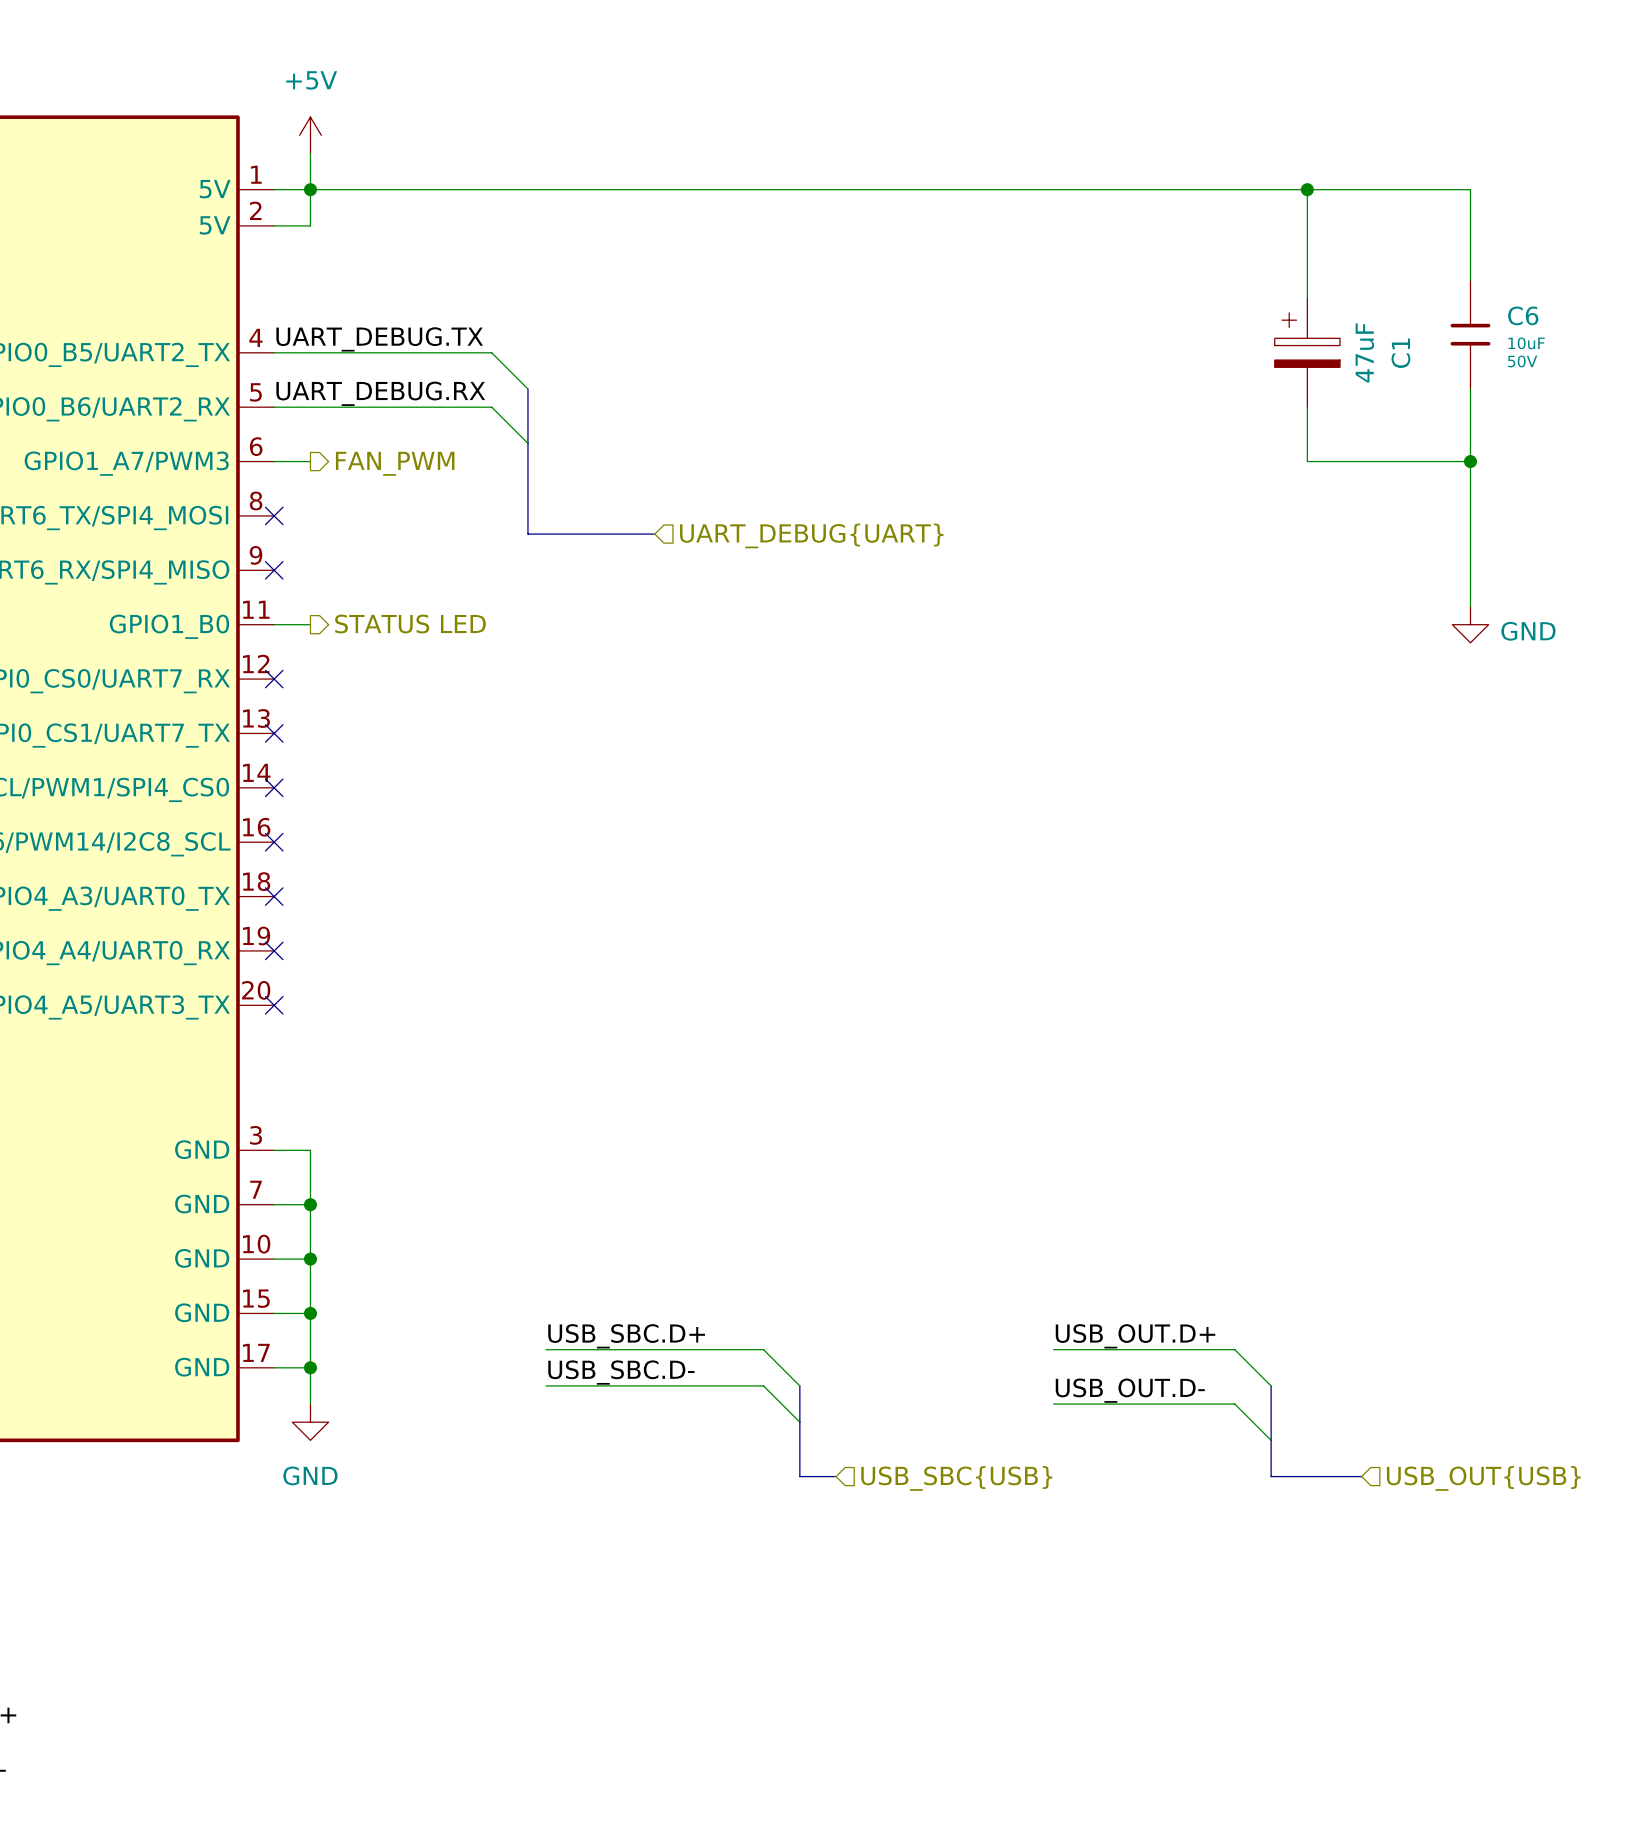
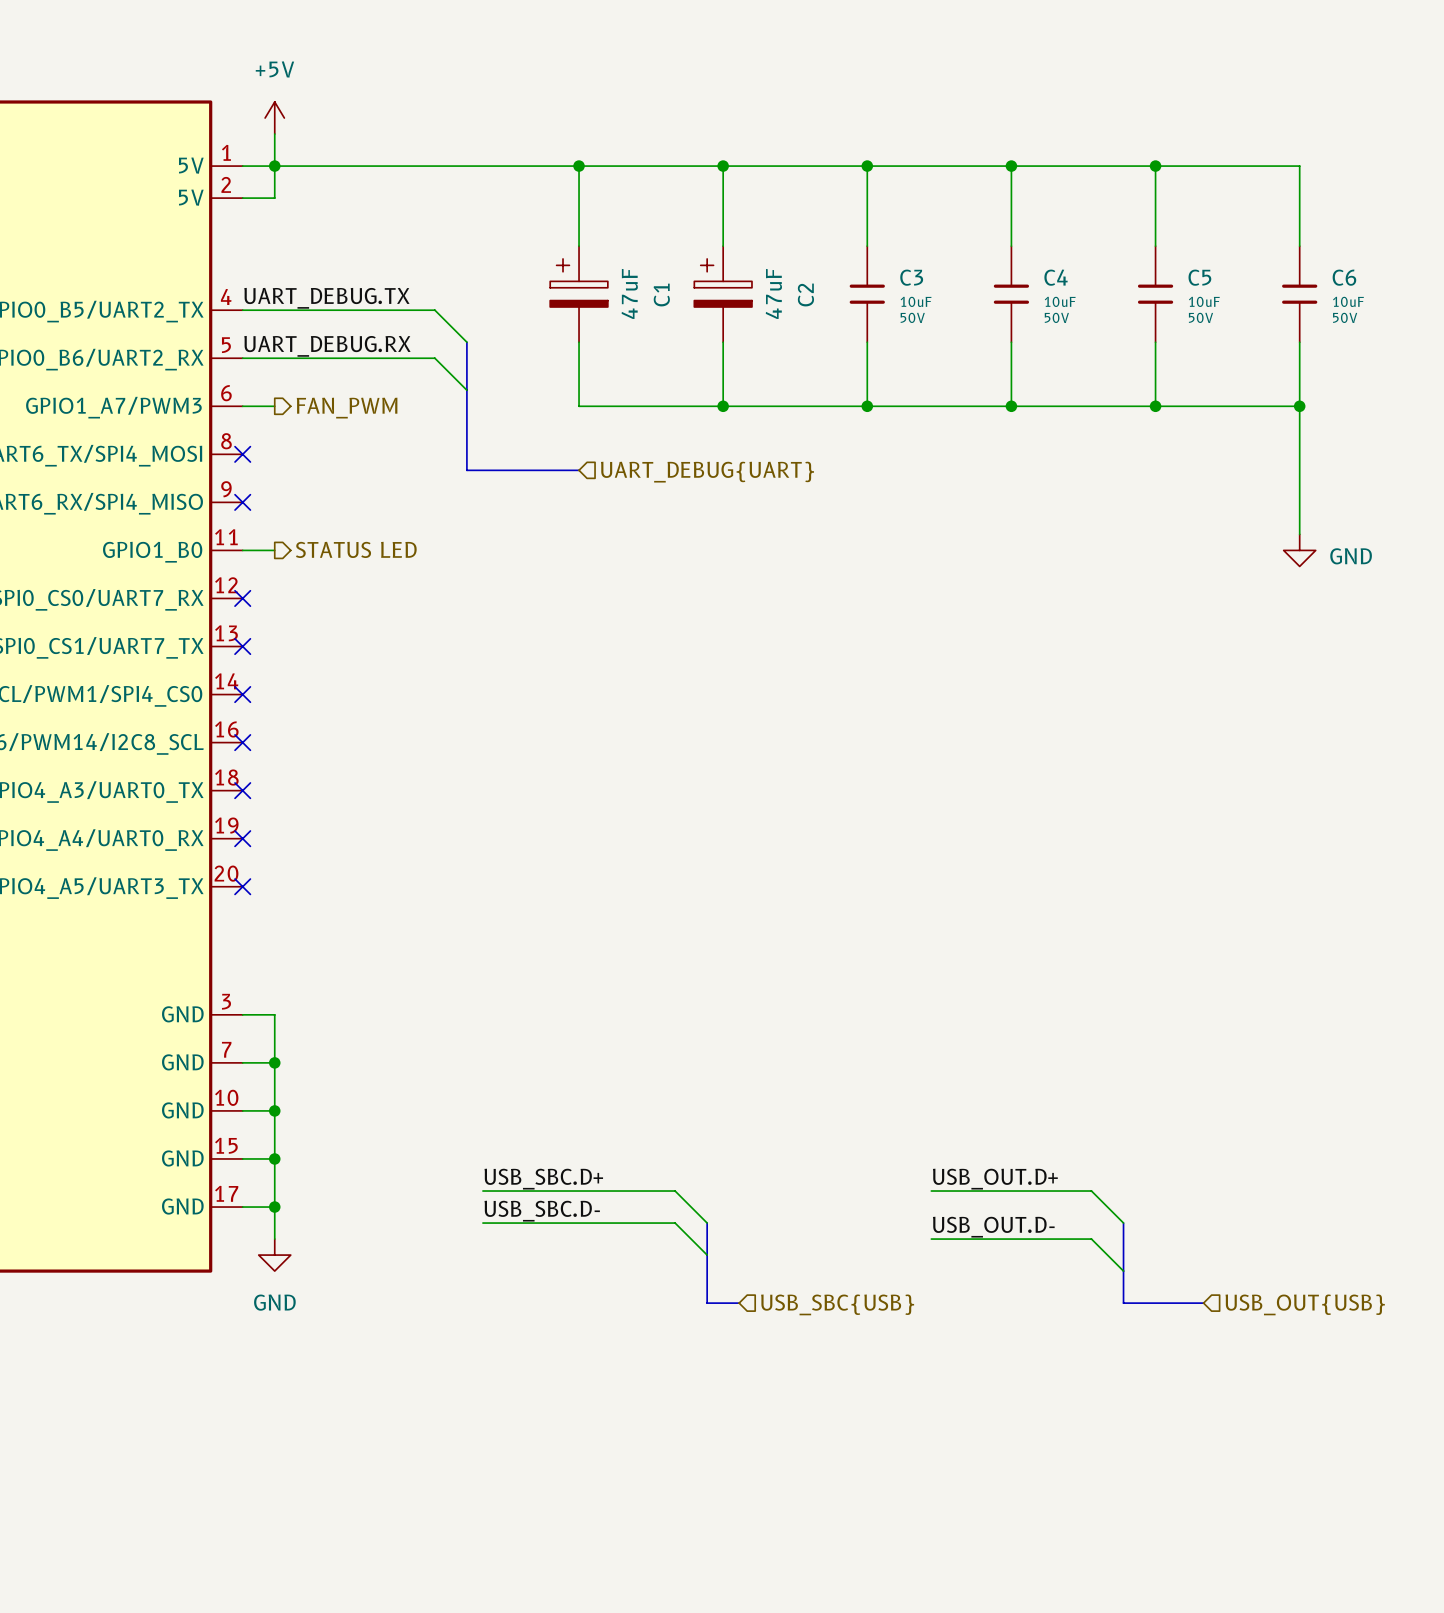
wire: none -> (579, 166) (579, 246)
junction: none -> (579, 166)
wire: none -> (723, 166) (723, 246)
junction: none -> (723, 166)
wire: none -> (867, 166) (867, 246)
junction: none -> (867, 166)
wire: none -> (1011, 166) (1011, 246)
junction: none -> (1011, 166)
C2: none -> 47uF (723, 294)
C3: none -> 10uF (867, 294)
C4: none -> 10uF (1011, 294)
C5: none -> 10uF (1155, 294)
C1 position: (1307, 352) -> (579, 294)
wire: none -> (579, 342) (579, 406) (1155, 406)
wire: none -> (723, 342) (723, 406)
wire: none -> (867, 342) (867, 406)
wire: none -> (1011, 342) (1011, 406)
junction: none -> (723, 406)
junction: none -> (867, 406)
junction: none -> (1011, 406)
junction: none -> (1155, 406)

